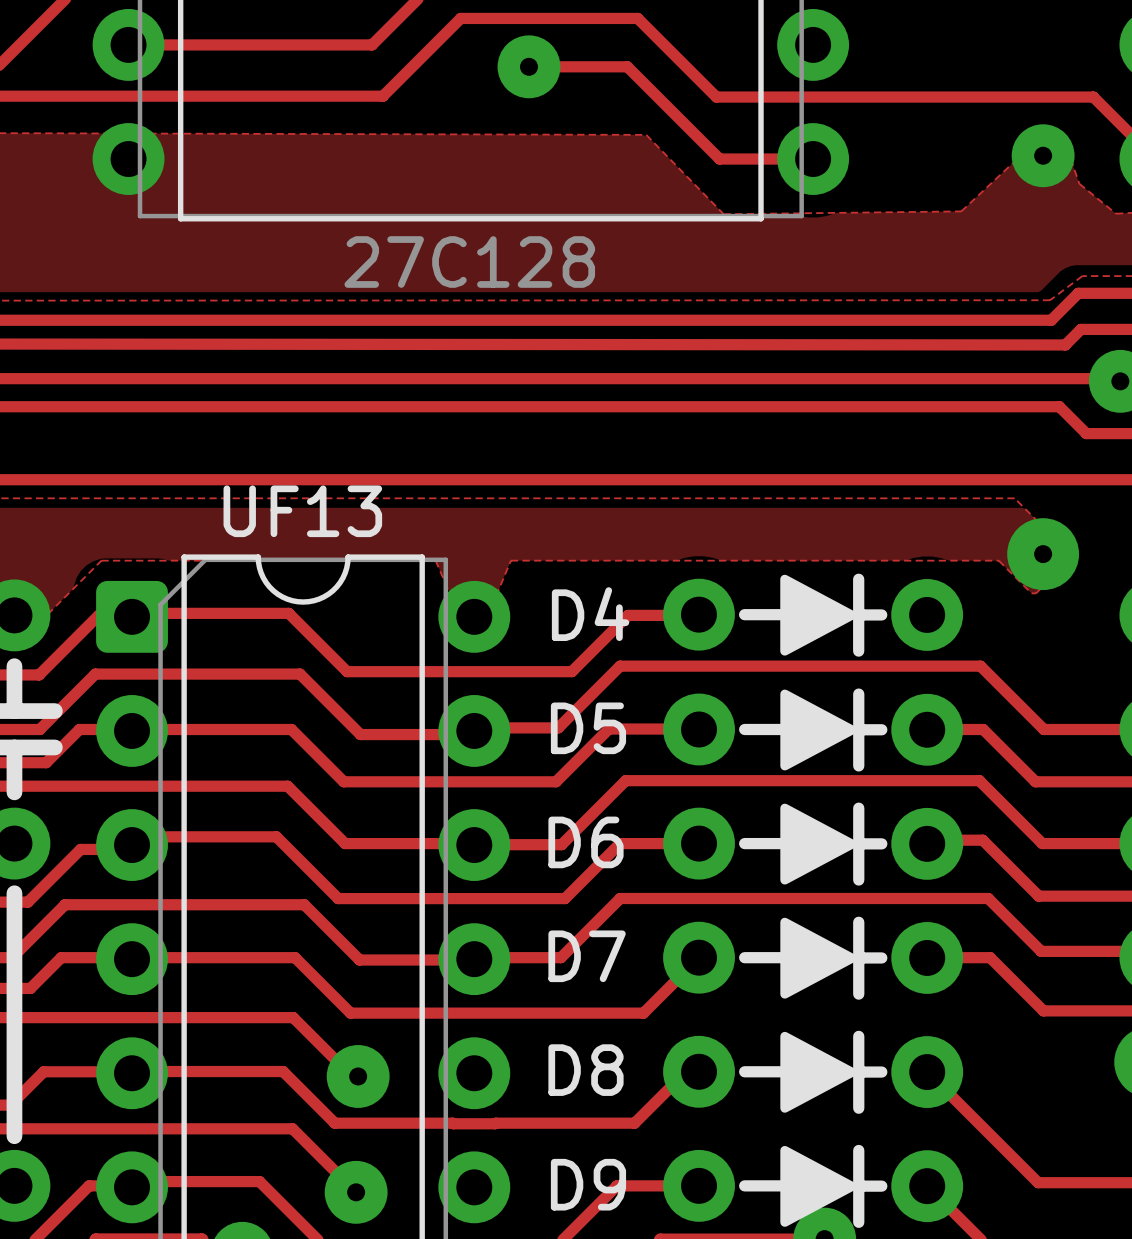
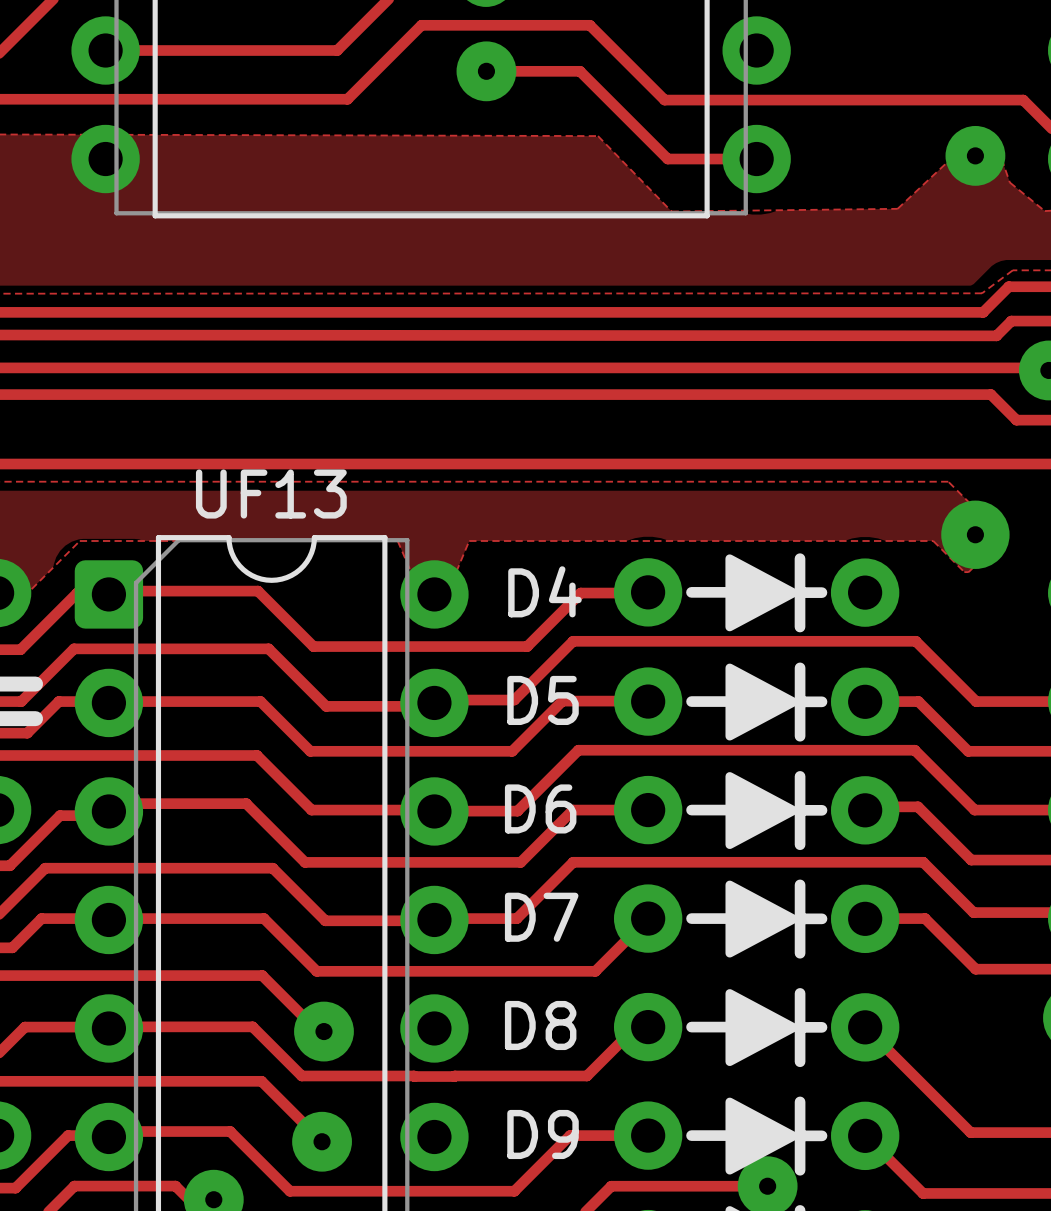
part value: 27C128 (469, 262) -> none

